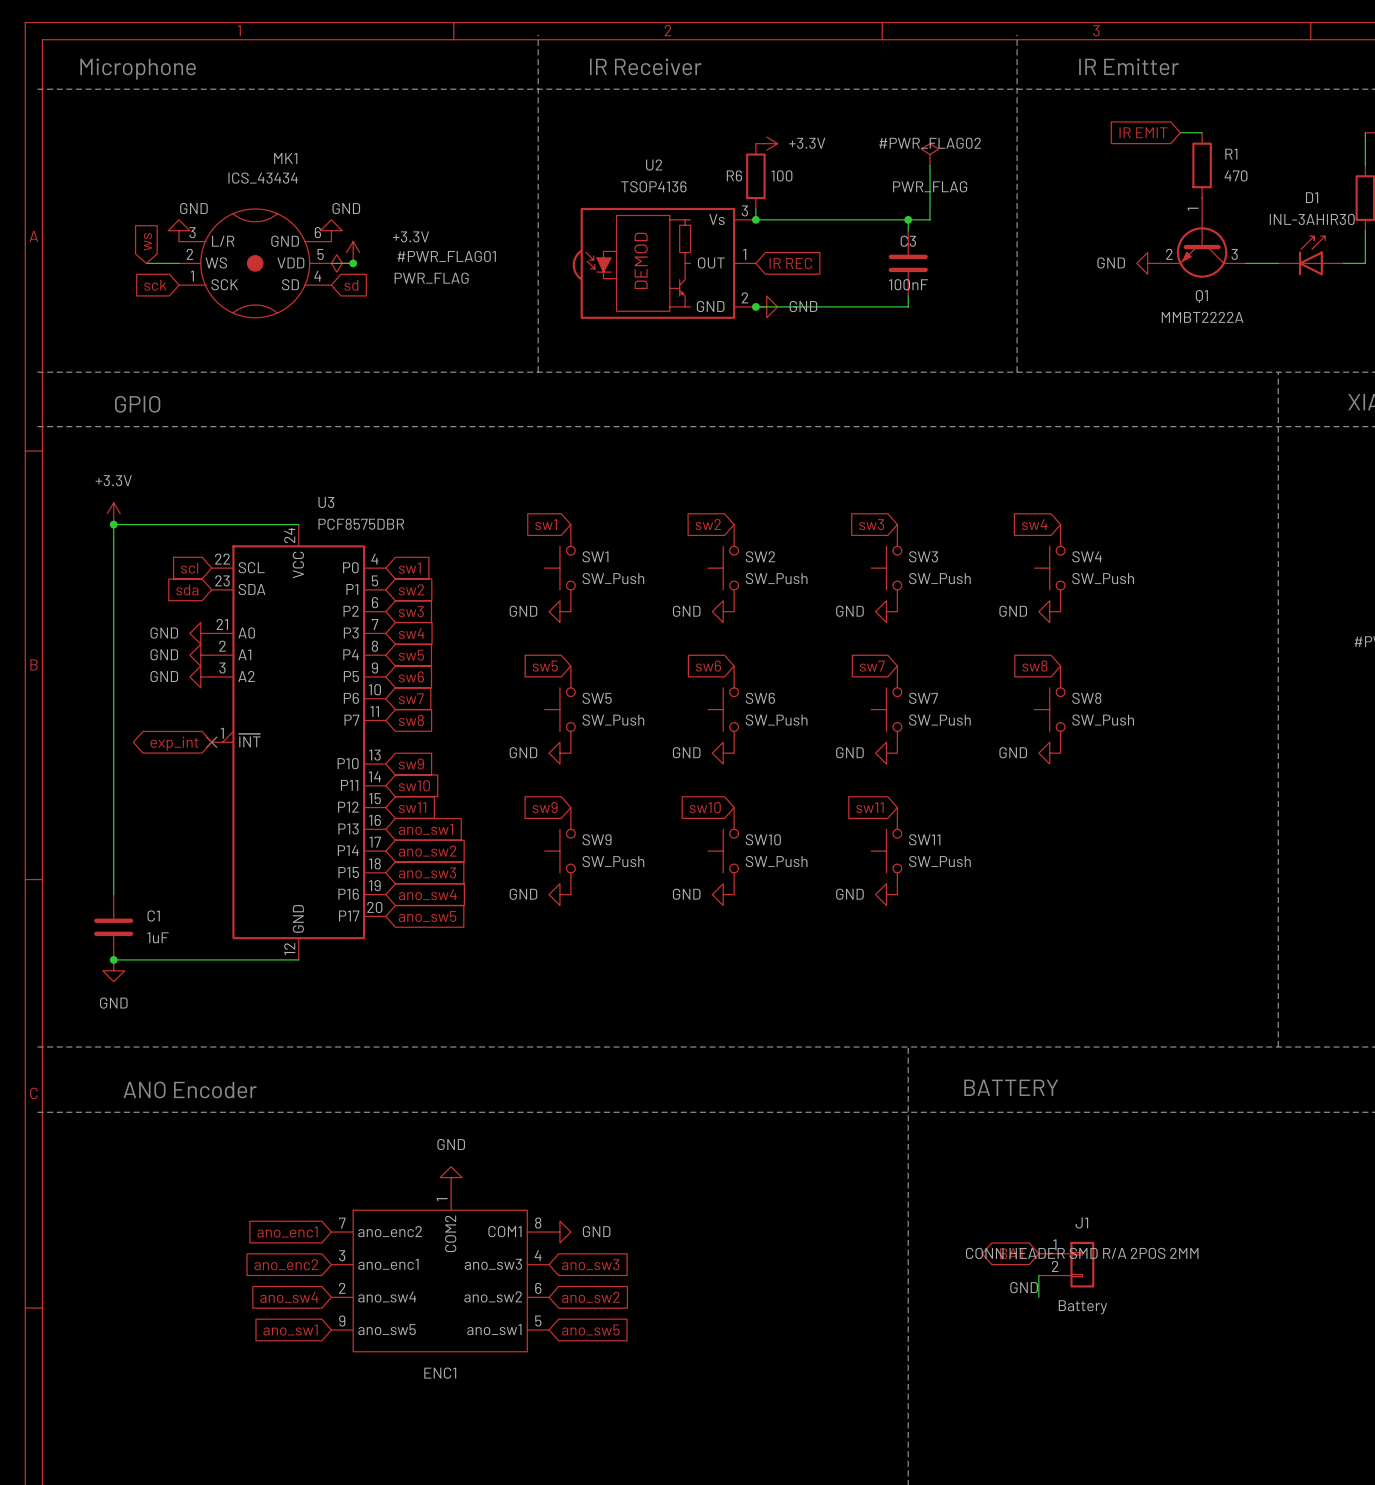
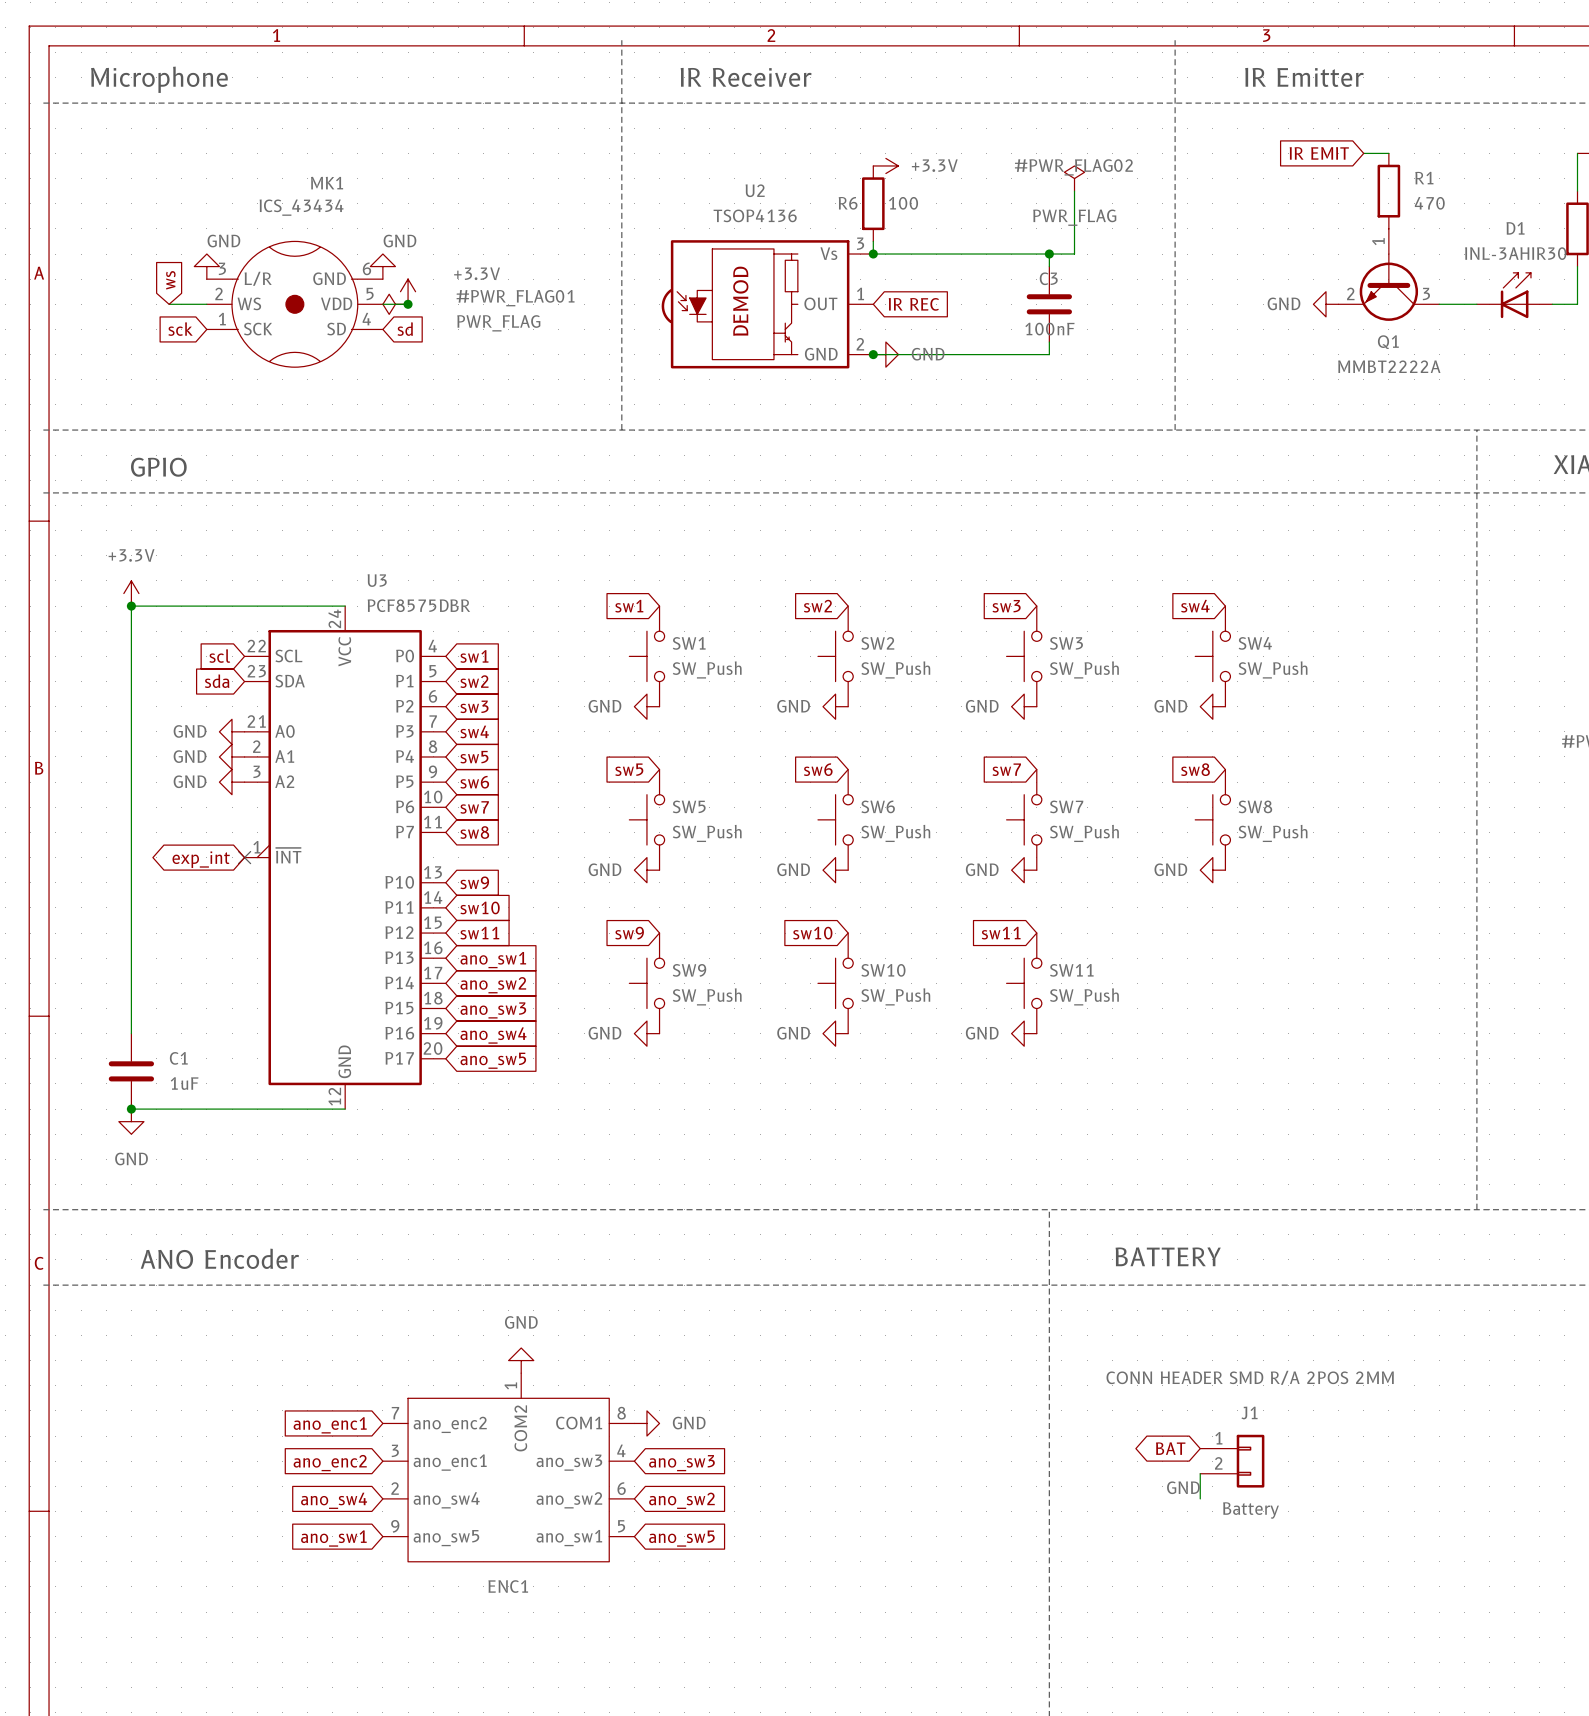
J1 text position: CONN HEADER SMD R/A 2POS 2MM (1082, 1253) -> CONN HEADER SMD R/A 2POS 2MM (1250, 1377)

